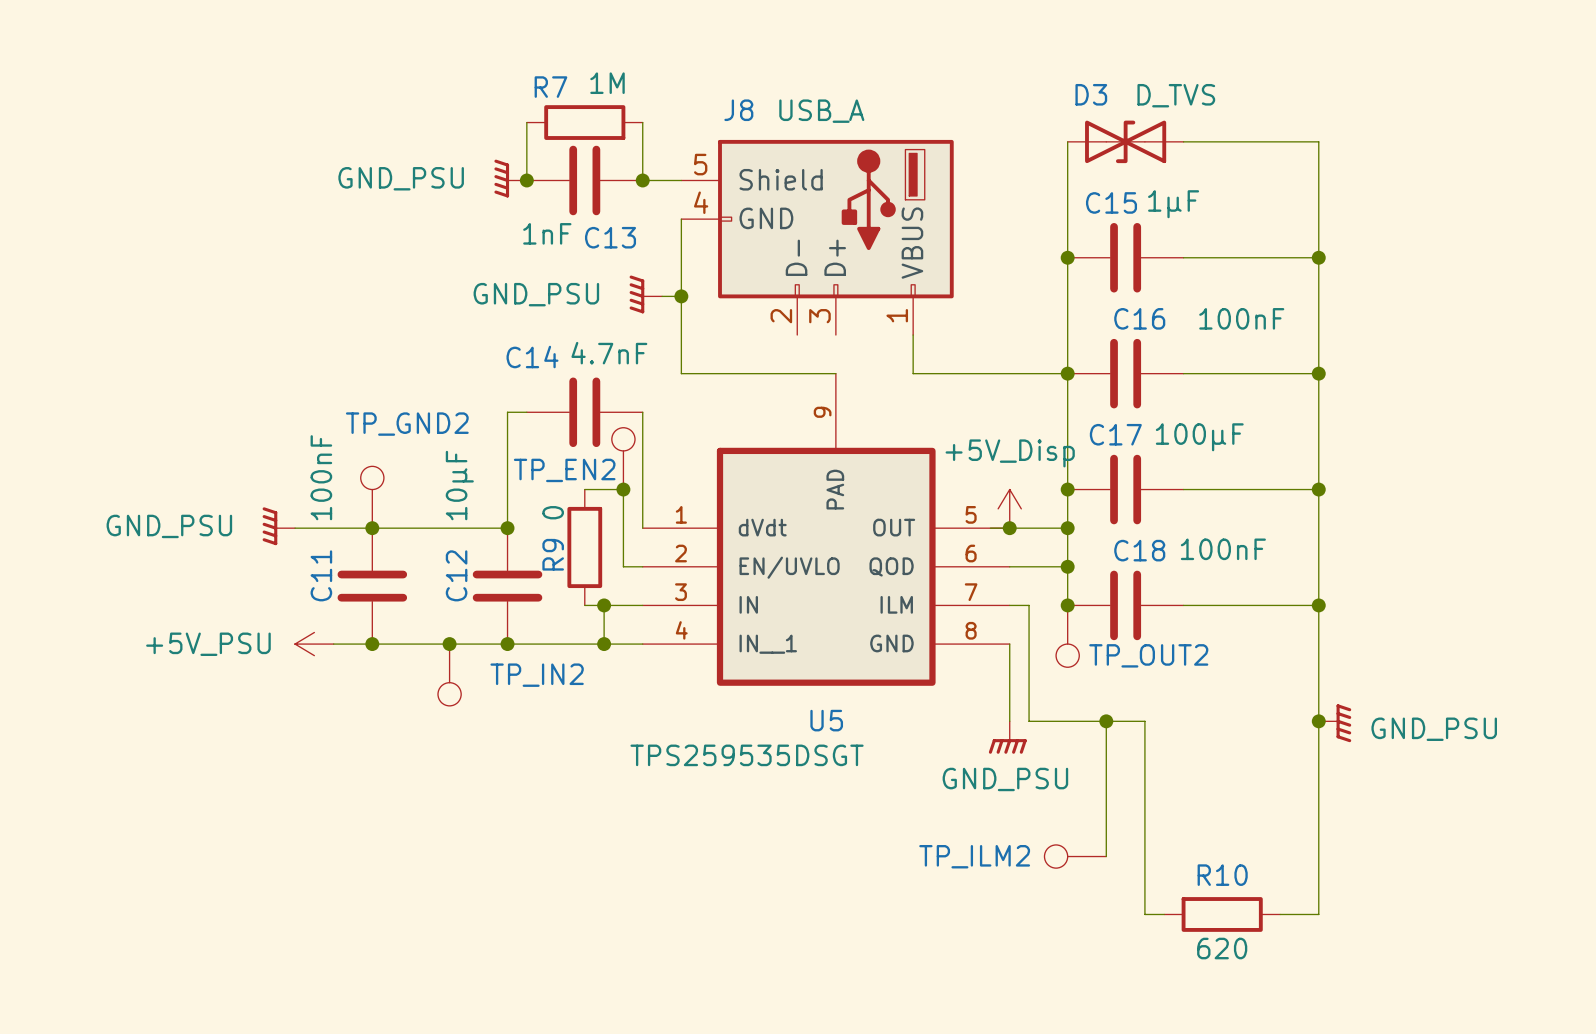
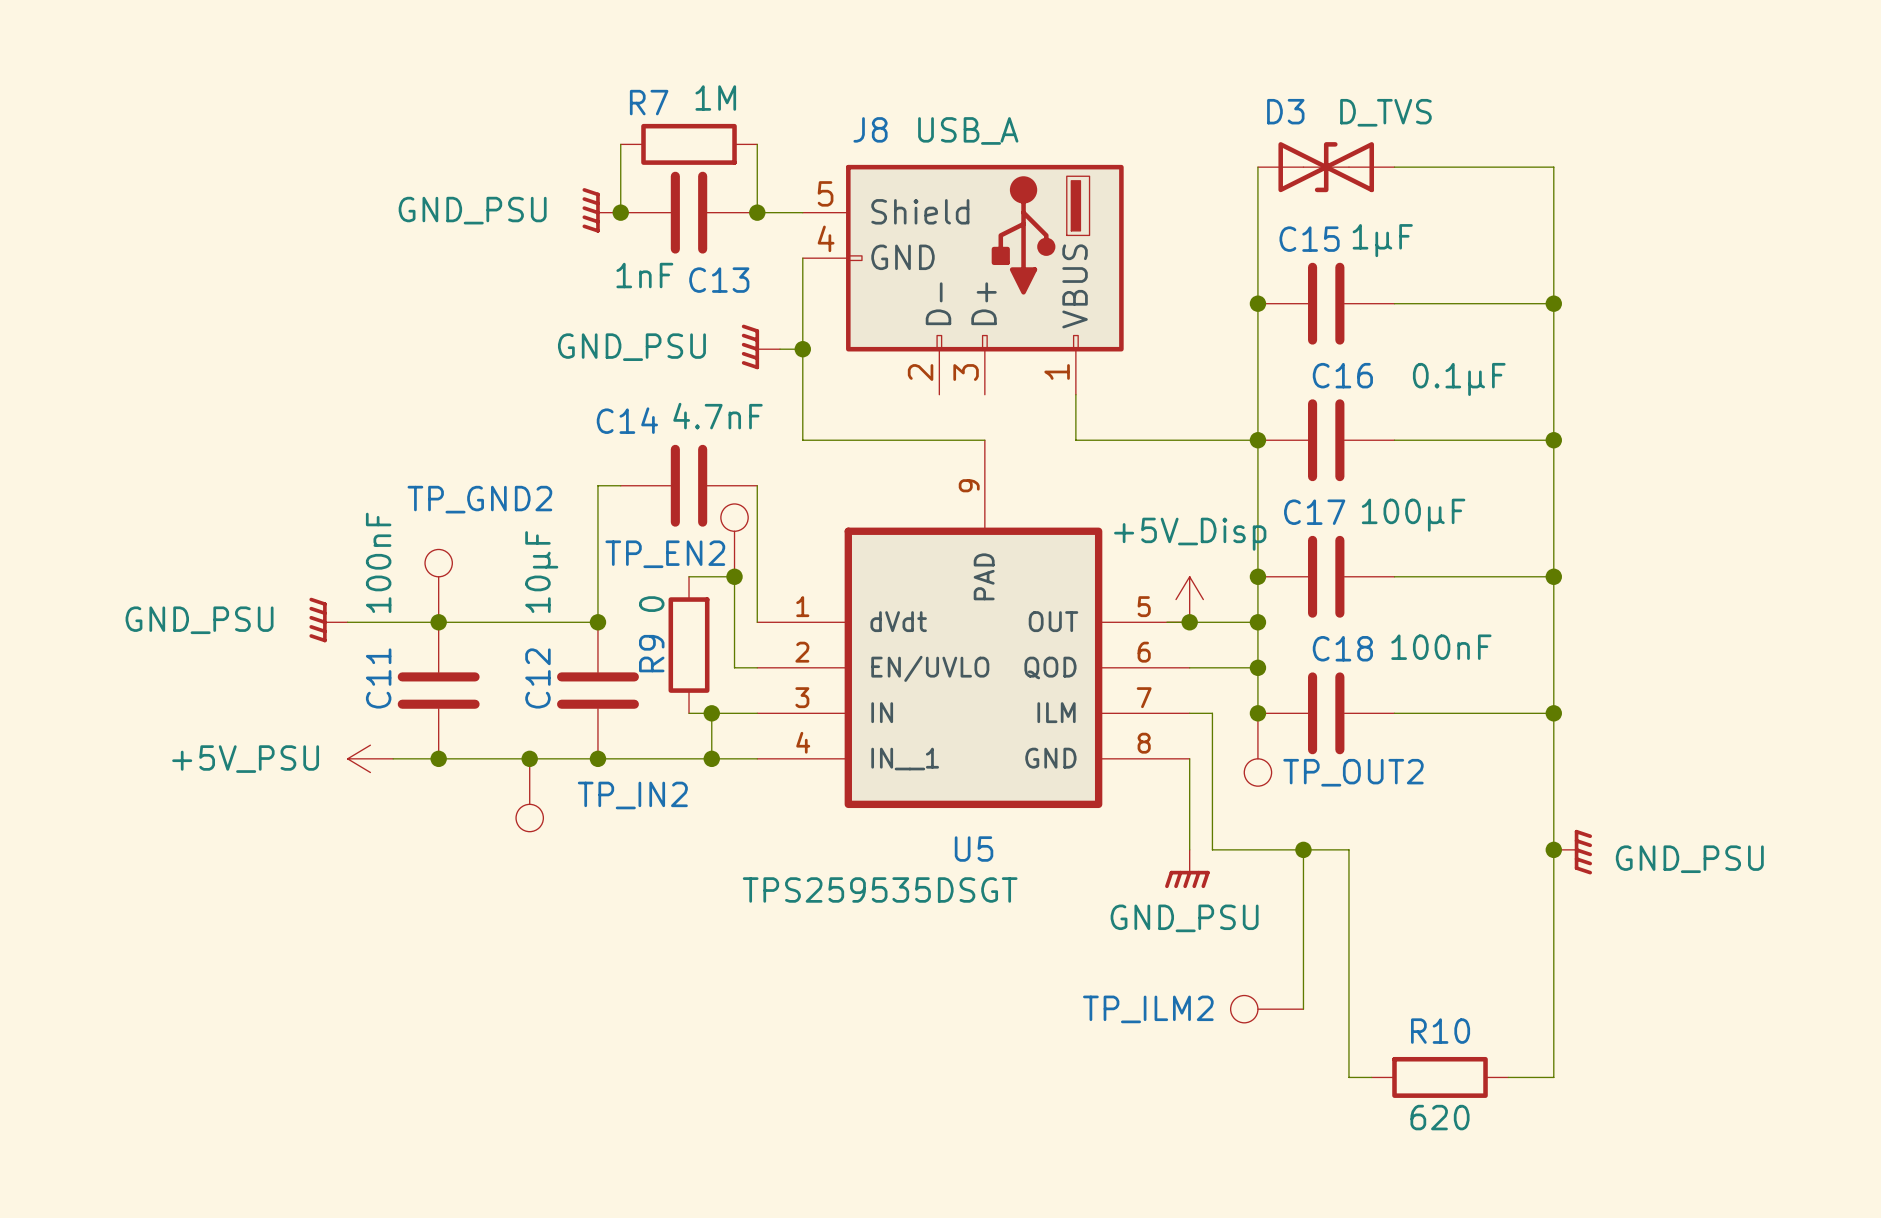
C16 value: 100nF (1241, 318) -> 0.1µF (1459, 379)

